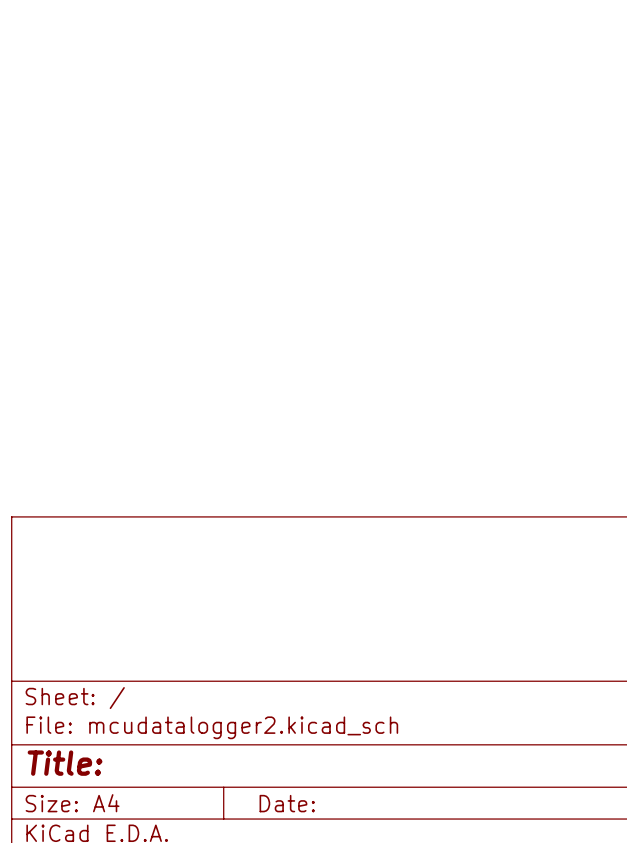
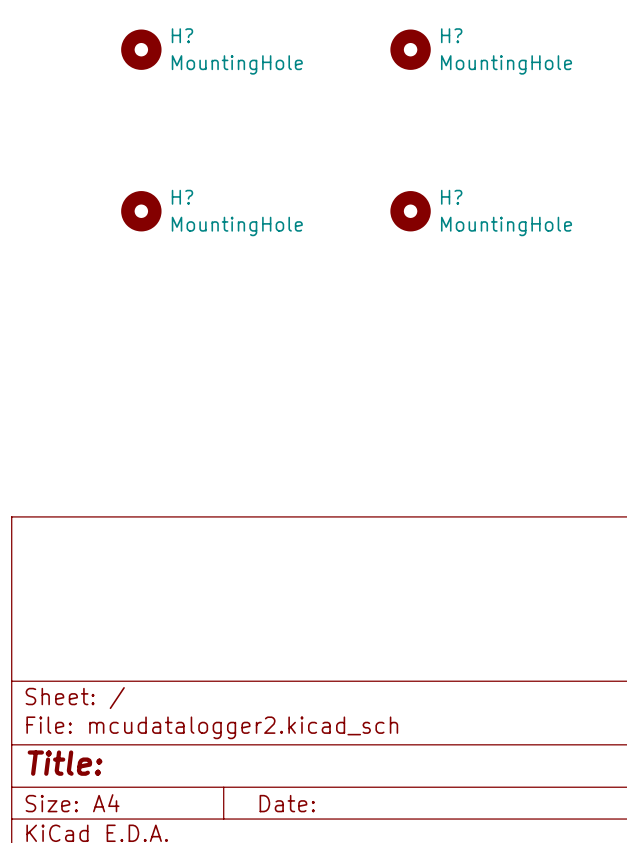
H?: none -> MountingHole (141, 49)
H?: none -> MountingHole (410, 49)
H?: none -> MountingHole (141, 211)
H?: none -> MountingHole (410, 211)

